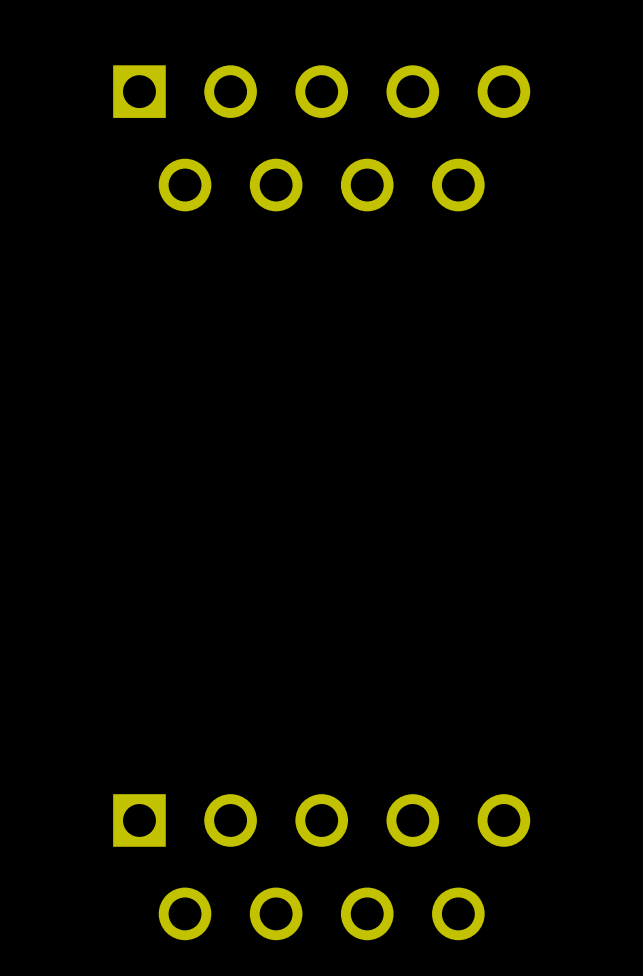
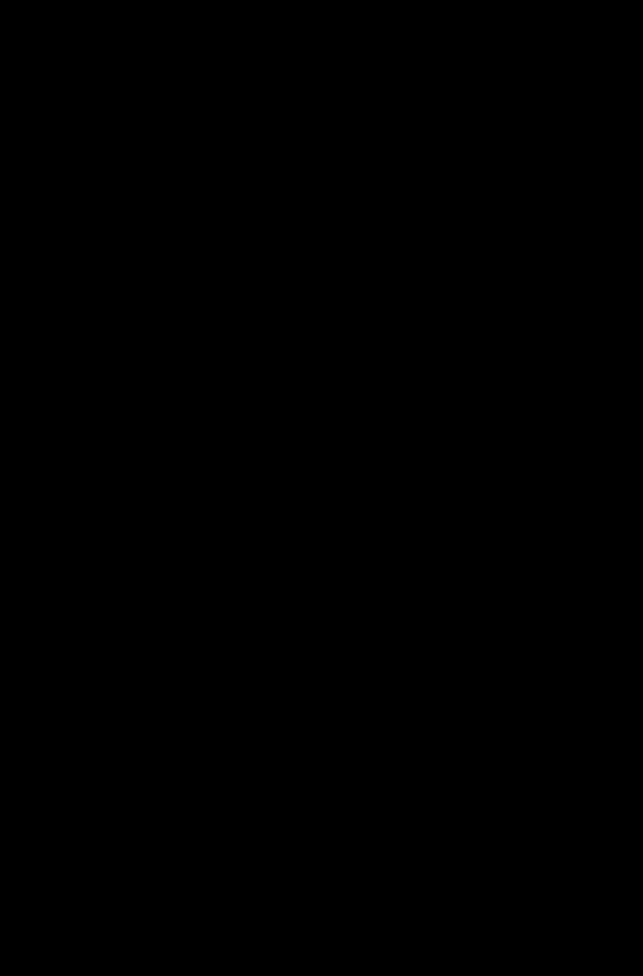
part: (321, 138) -> none
part: (321, 867) -> none

